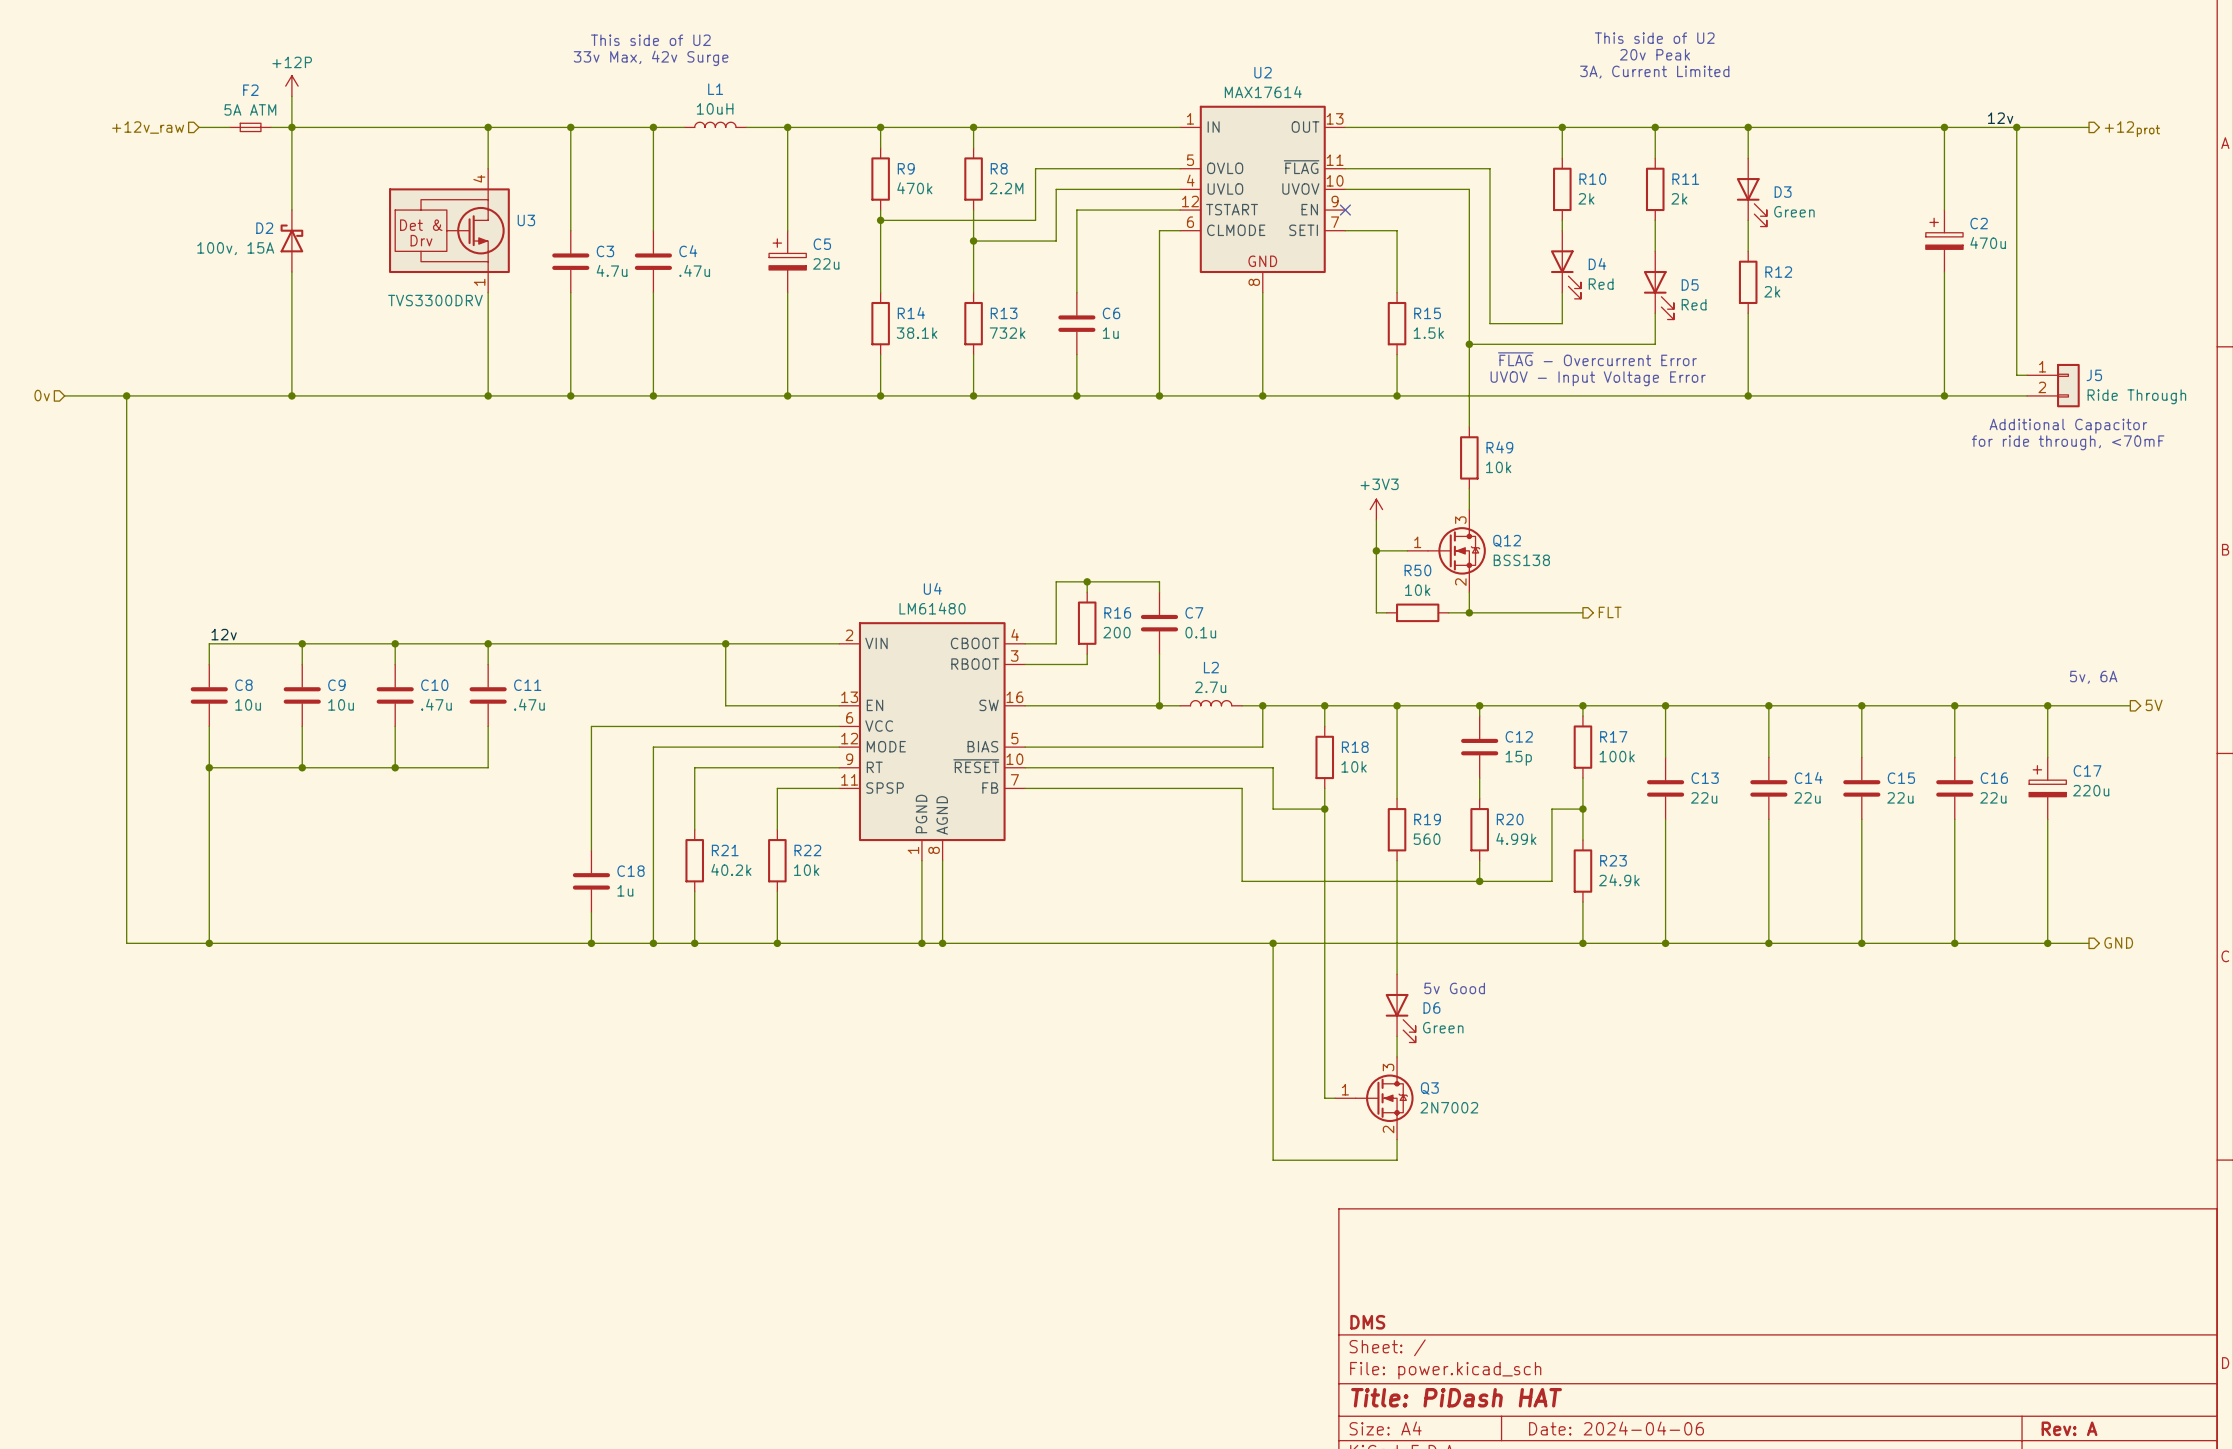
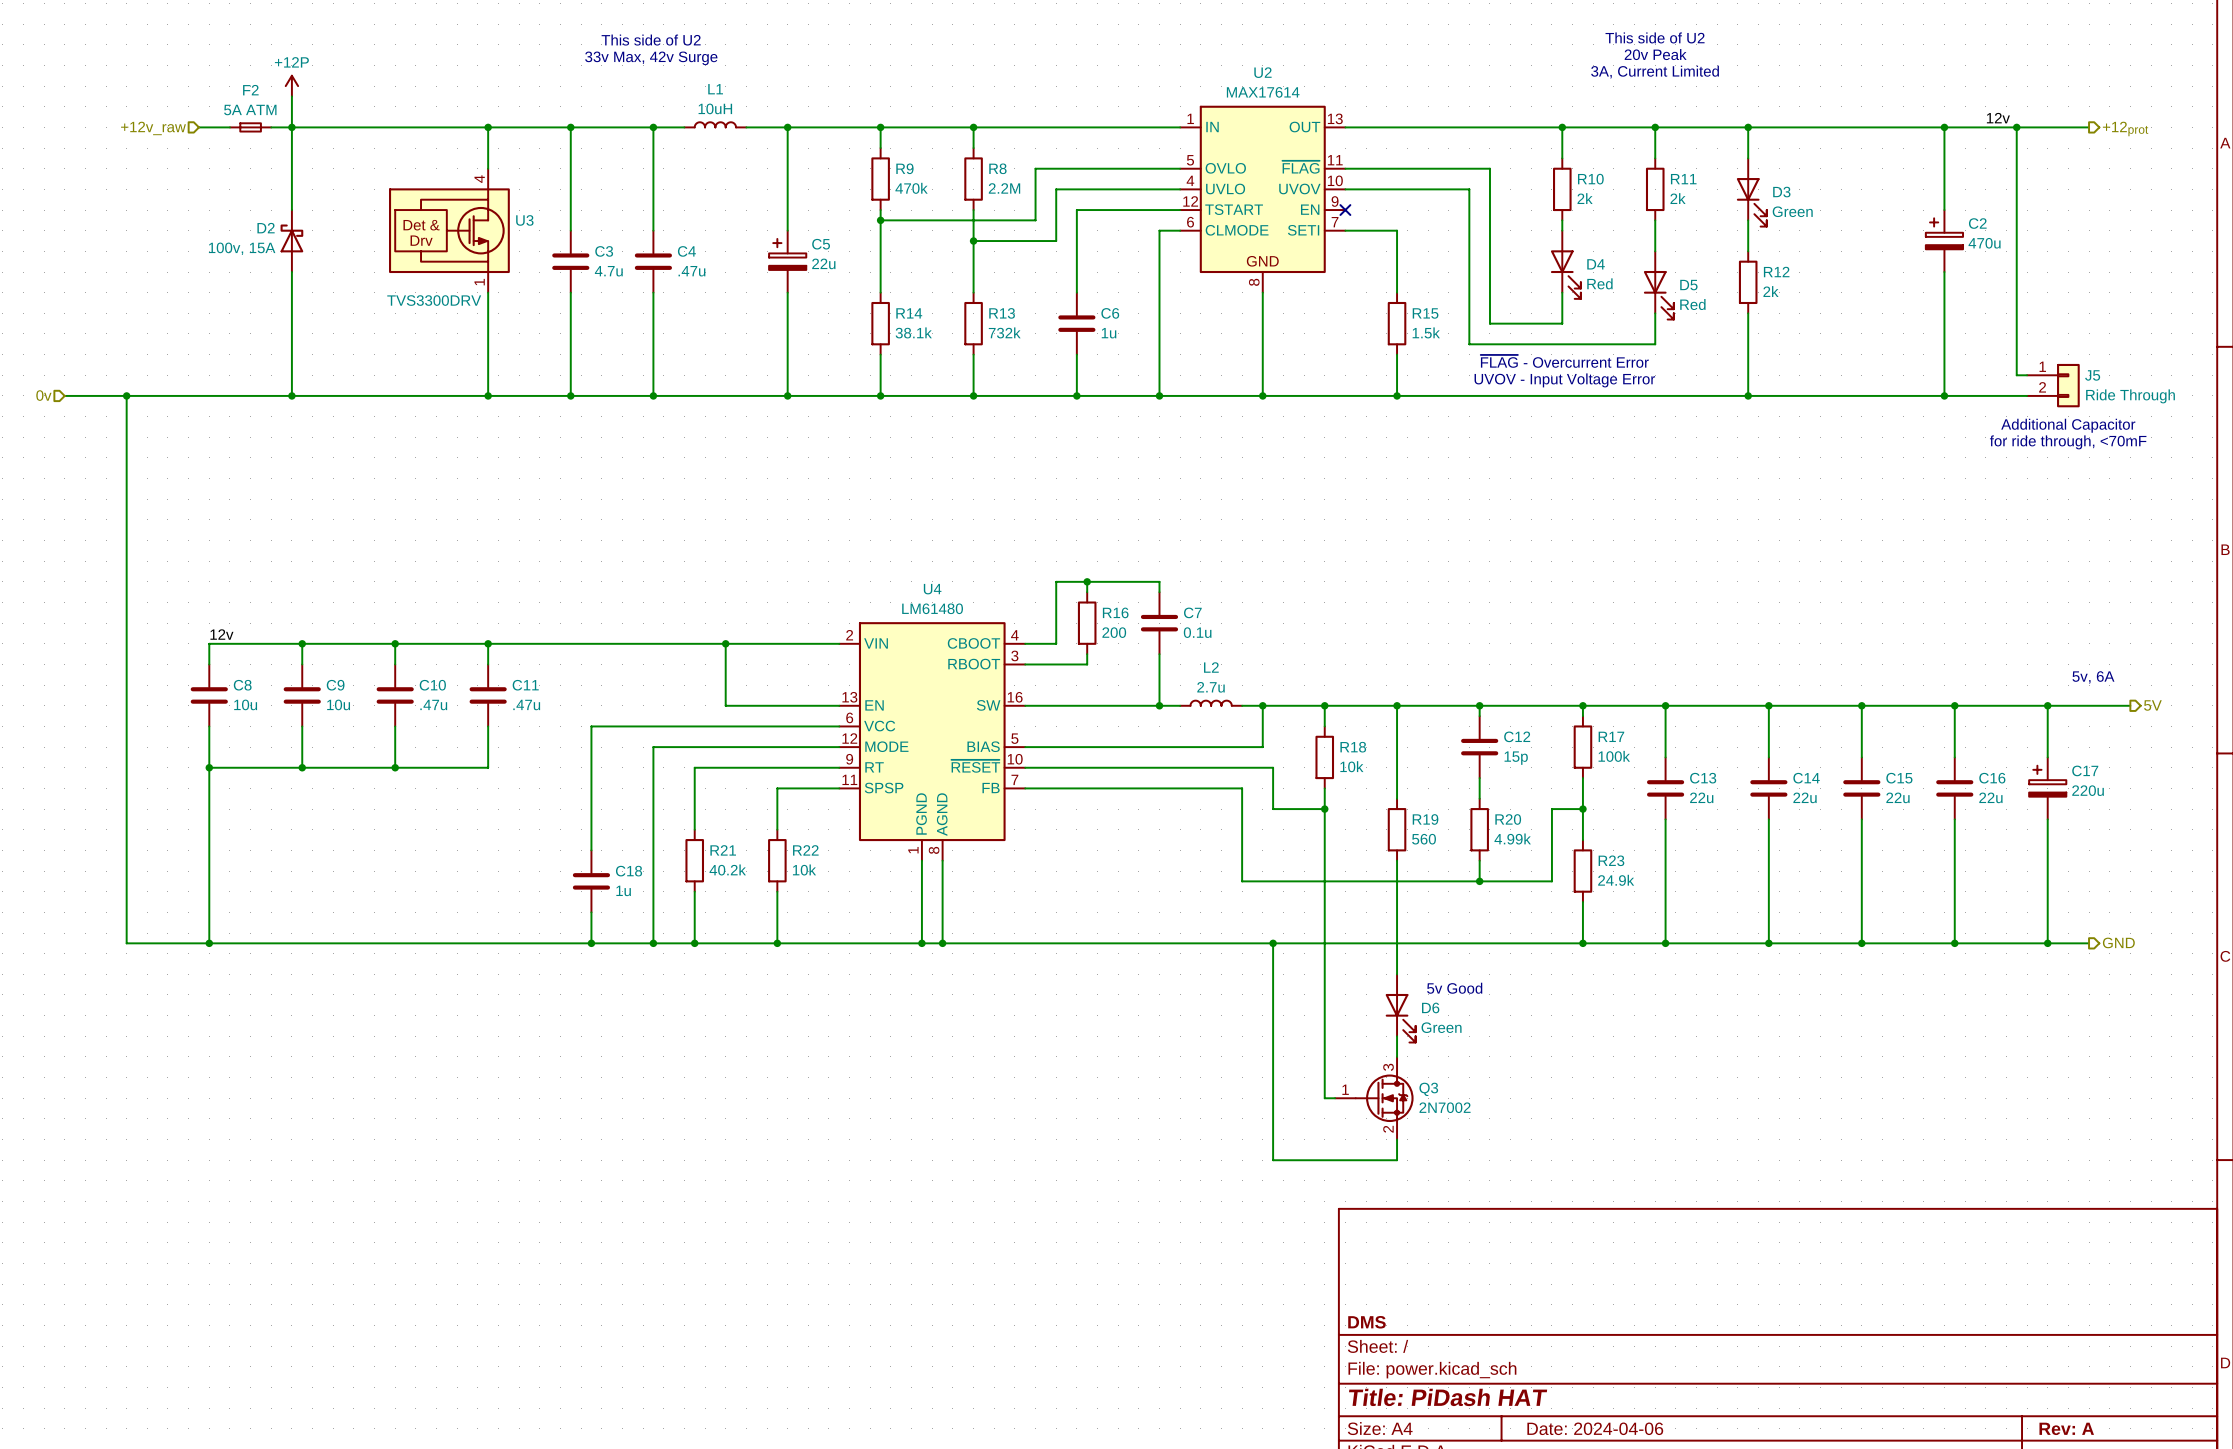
wire: (1469, 344) (1469, 426) -> none
junction: (1469, 344) -> none
text position: ~{FLAG} - Overcurrent Error (1597, 359) -> ~{FLAG} - Overcurrent Error (1564, 361)
text position: UVOV - Input Voltage Error (1598, 378) -> UVOV - Input Voltage Error (1564, 380)
R49: 10k (1469, 457) -> none
wire: (1469, 488) (1469, 509) -> none
power symbol: +3V3 (1376, 509) -> none
wire: (1376, 519) (1376, 612) (1386, 612) -> none
wire: (1376, 550) (1407, 550) -> none
junction: (1376, 550) -> none
Q12: BSS138 (1446, 550) -> none
wire: (1469, 592) (1469, 612) -> none
R50: 10k (1417, 612) -> none
wire: (1448, 612) (1582, 612) -> none
junction: (1469, 612) -> none
hierarchical label: FLT (1610, 612) -> none

